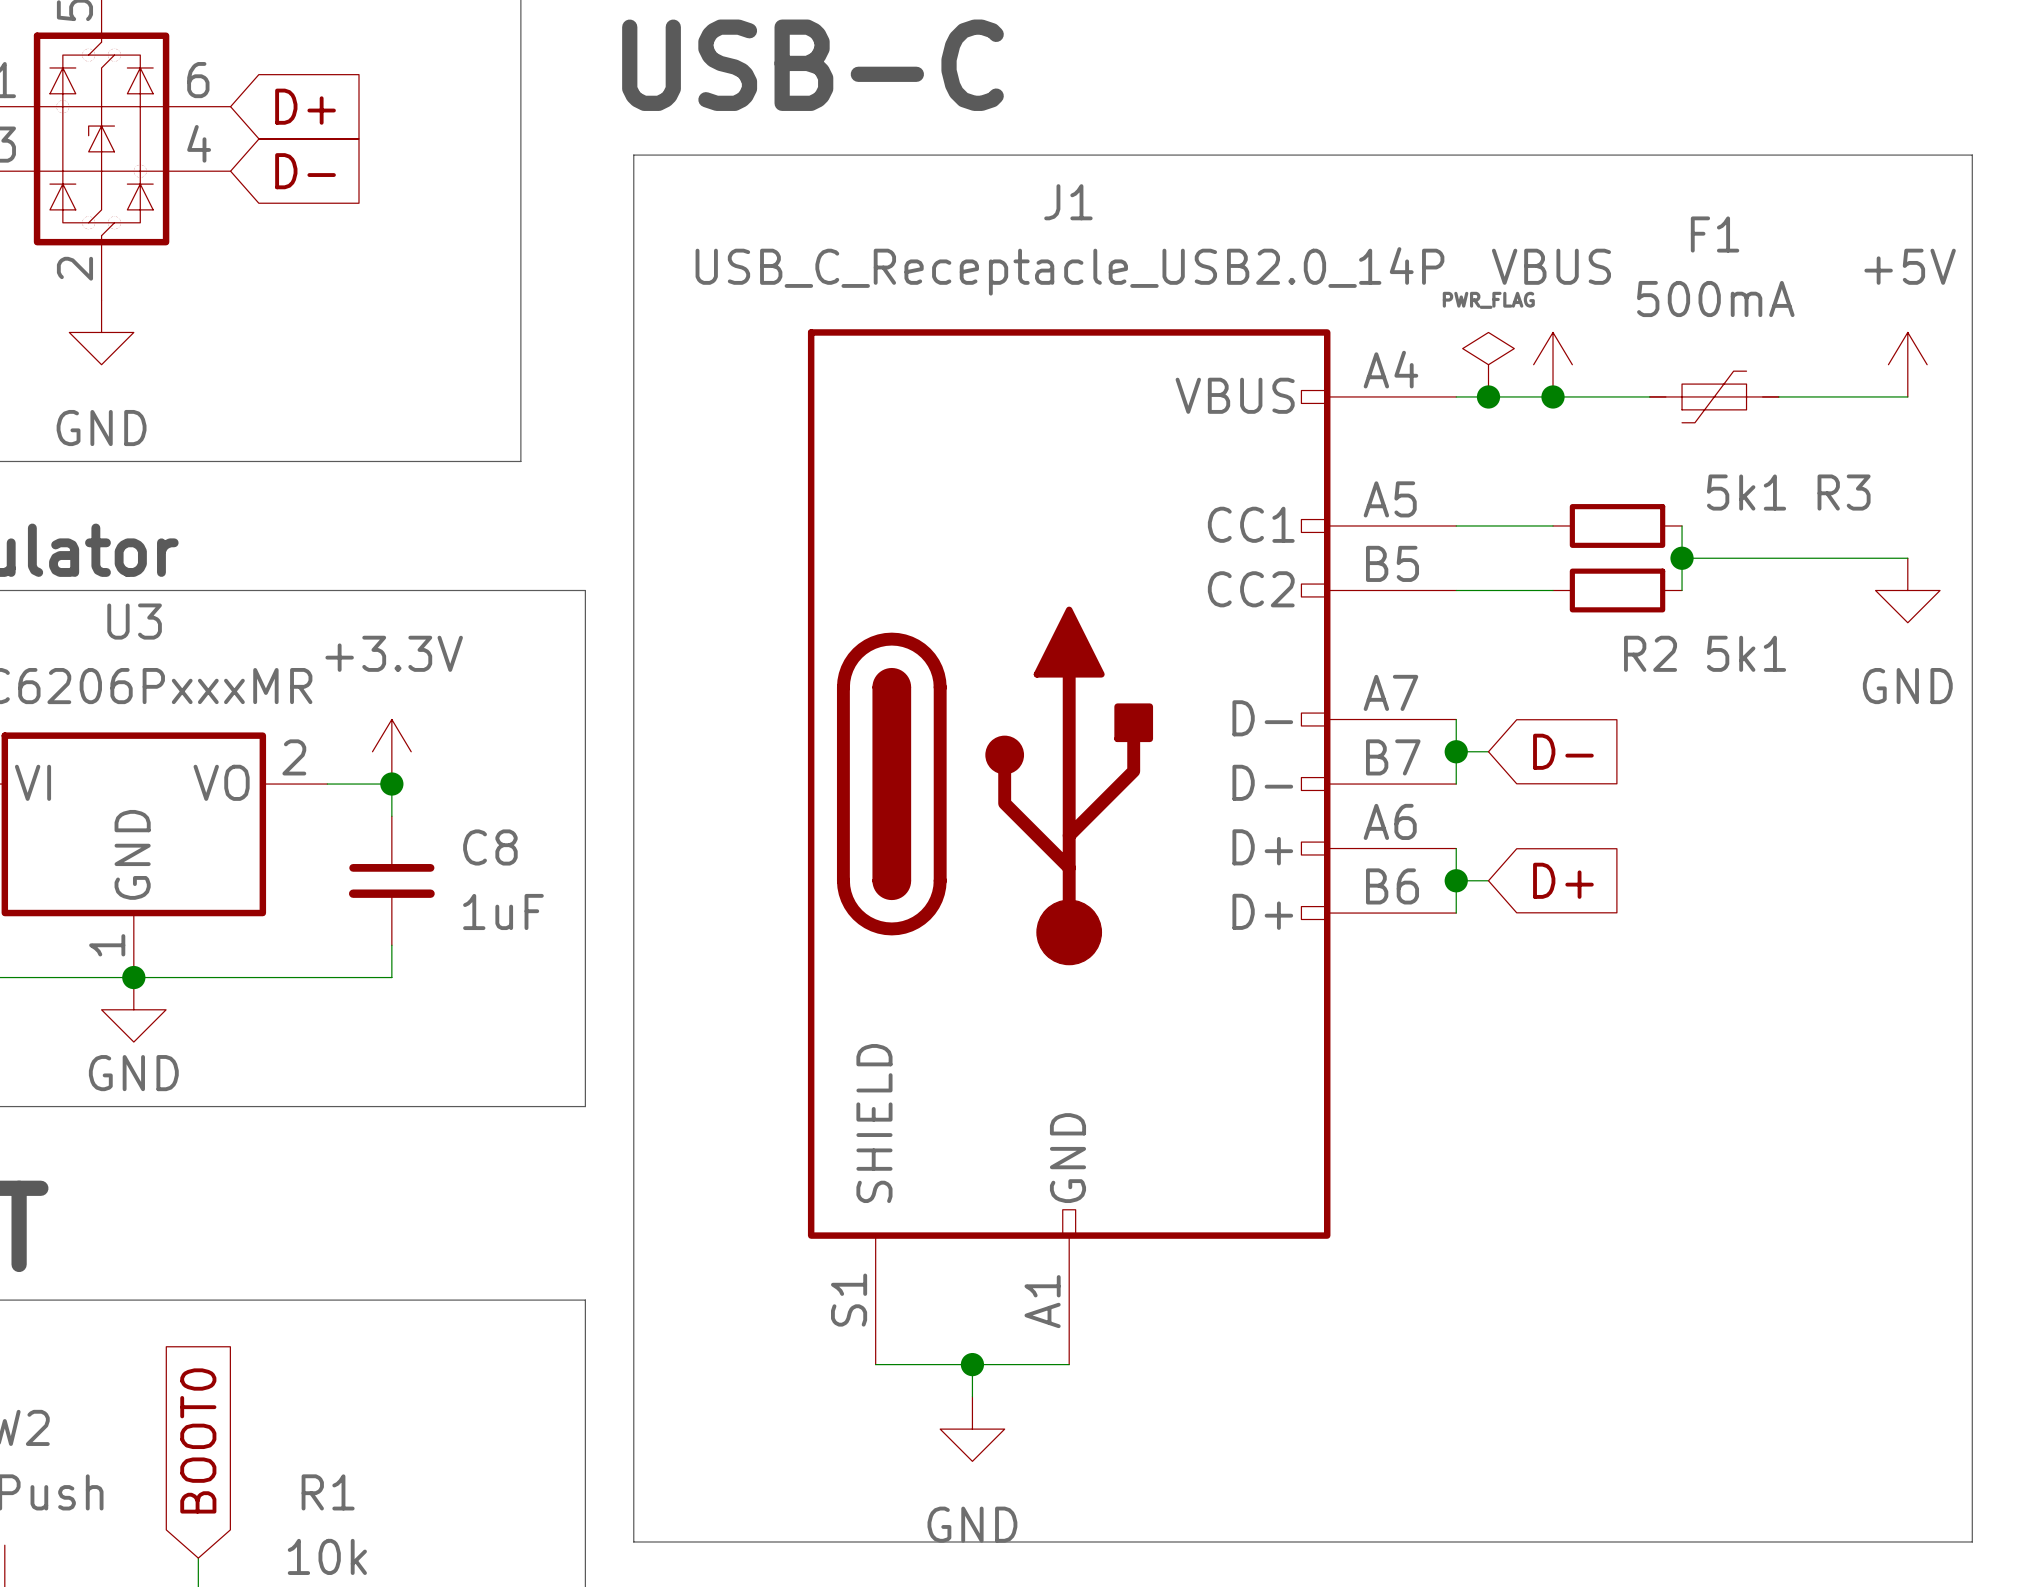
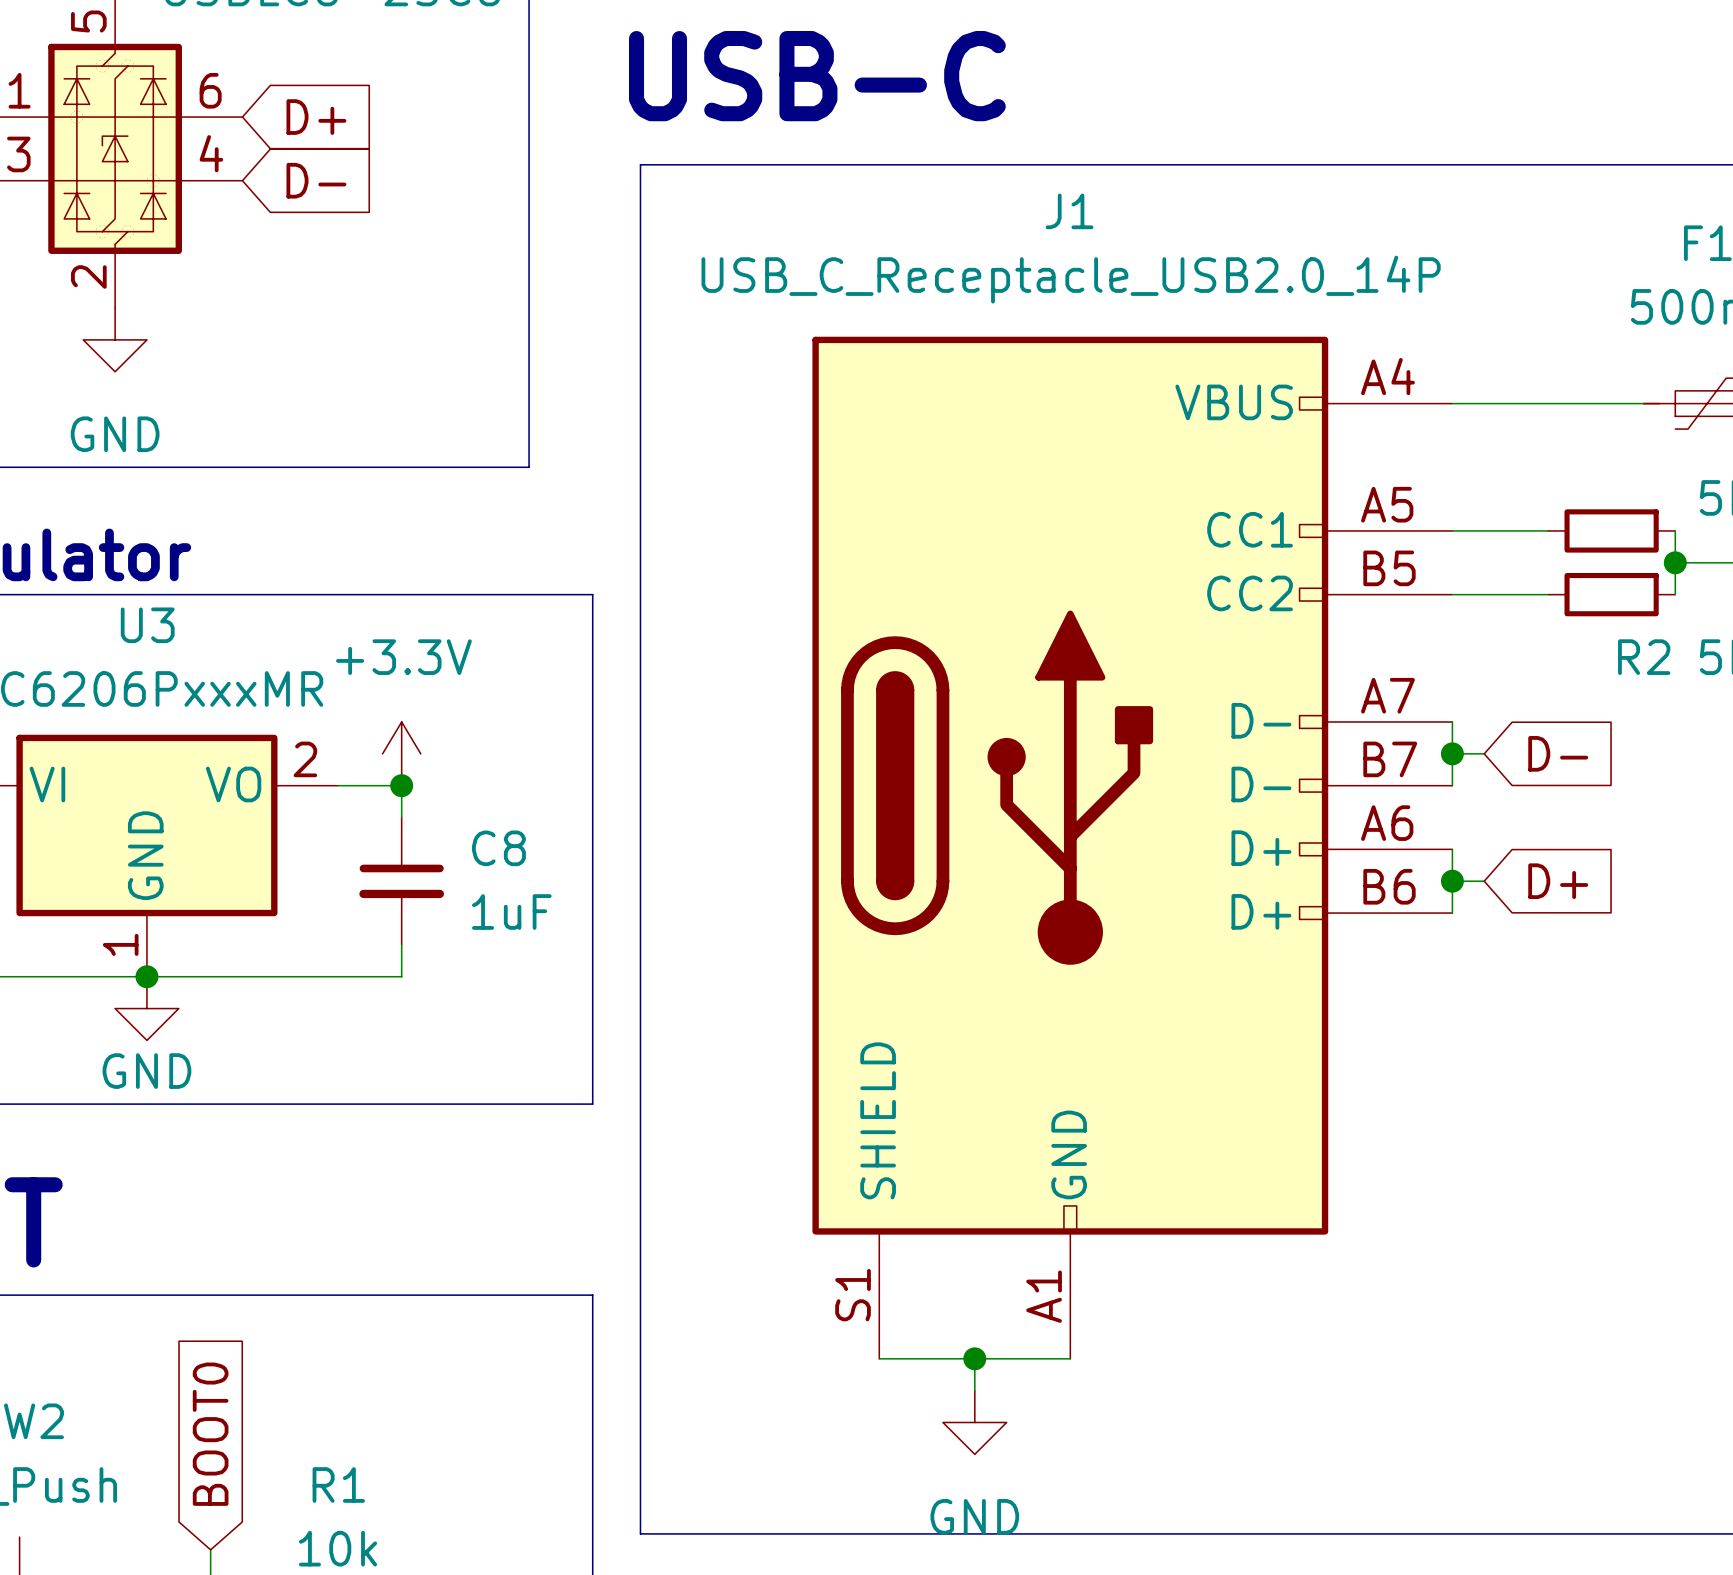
power symbol: PWR_FLAG (1488, 364) -> none
power symbol: VBUS (1553, 364) -> none
junction: (1488, 396) -> none
junction: (1553, 396) -> none

